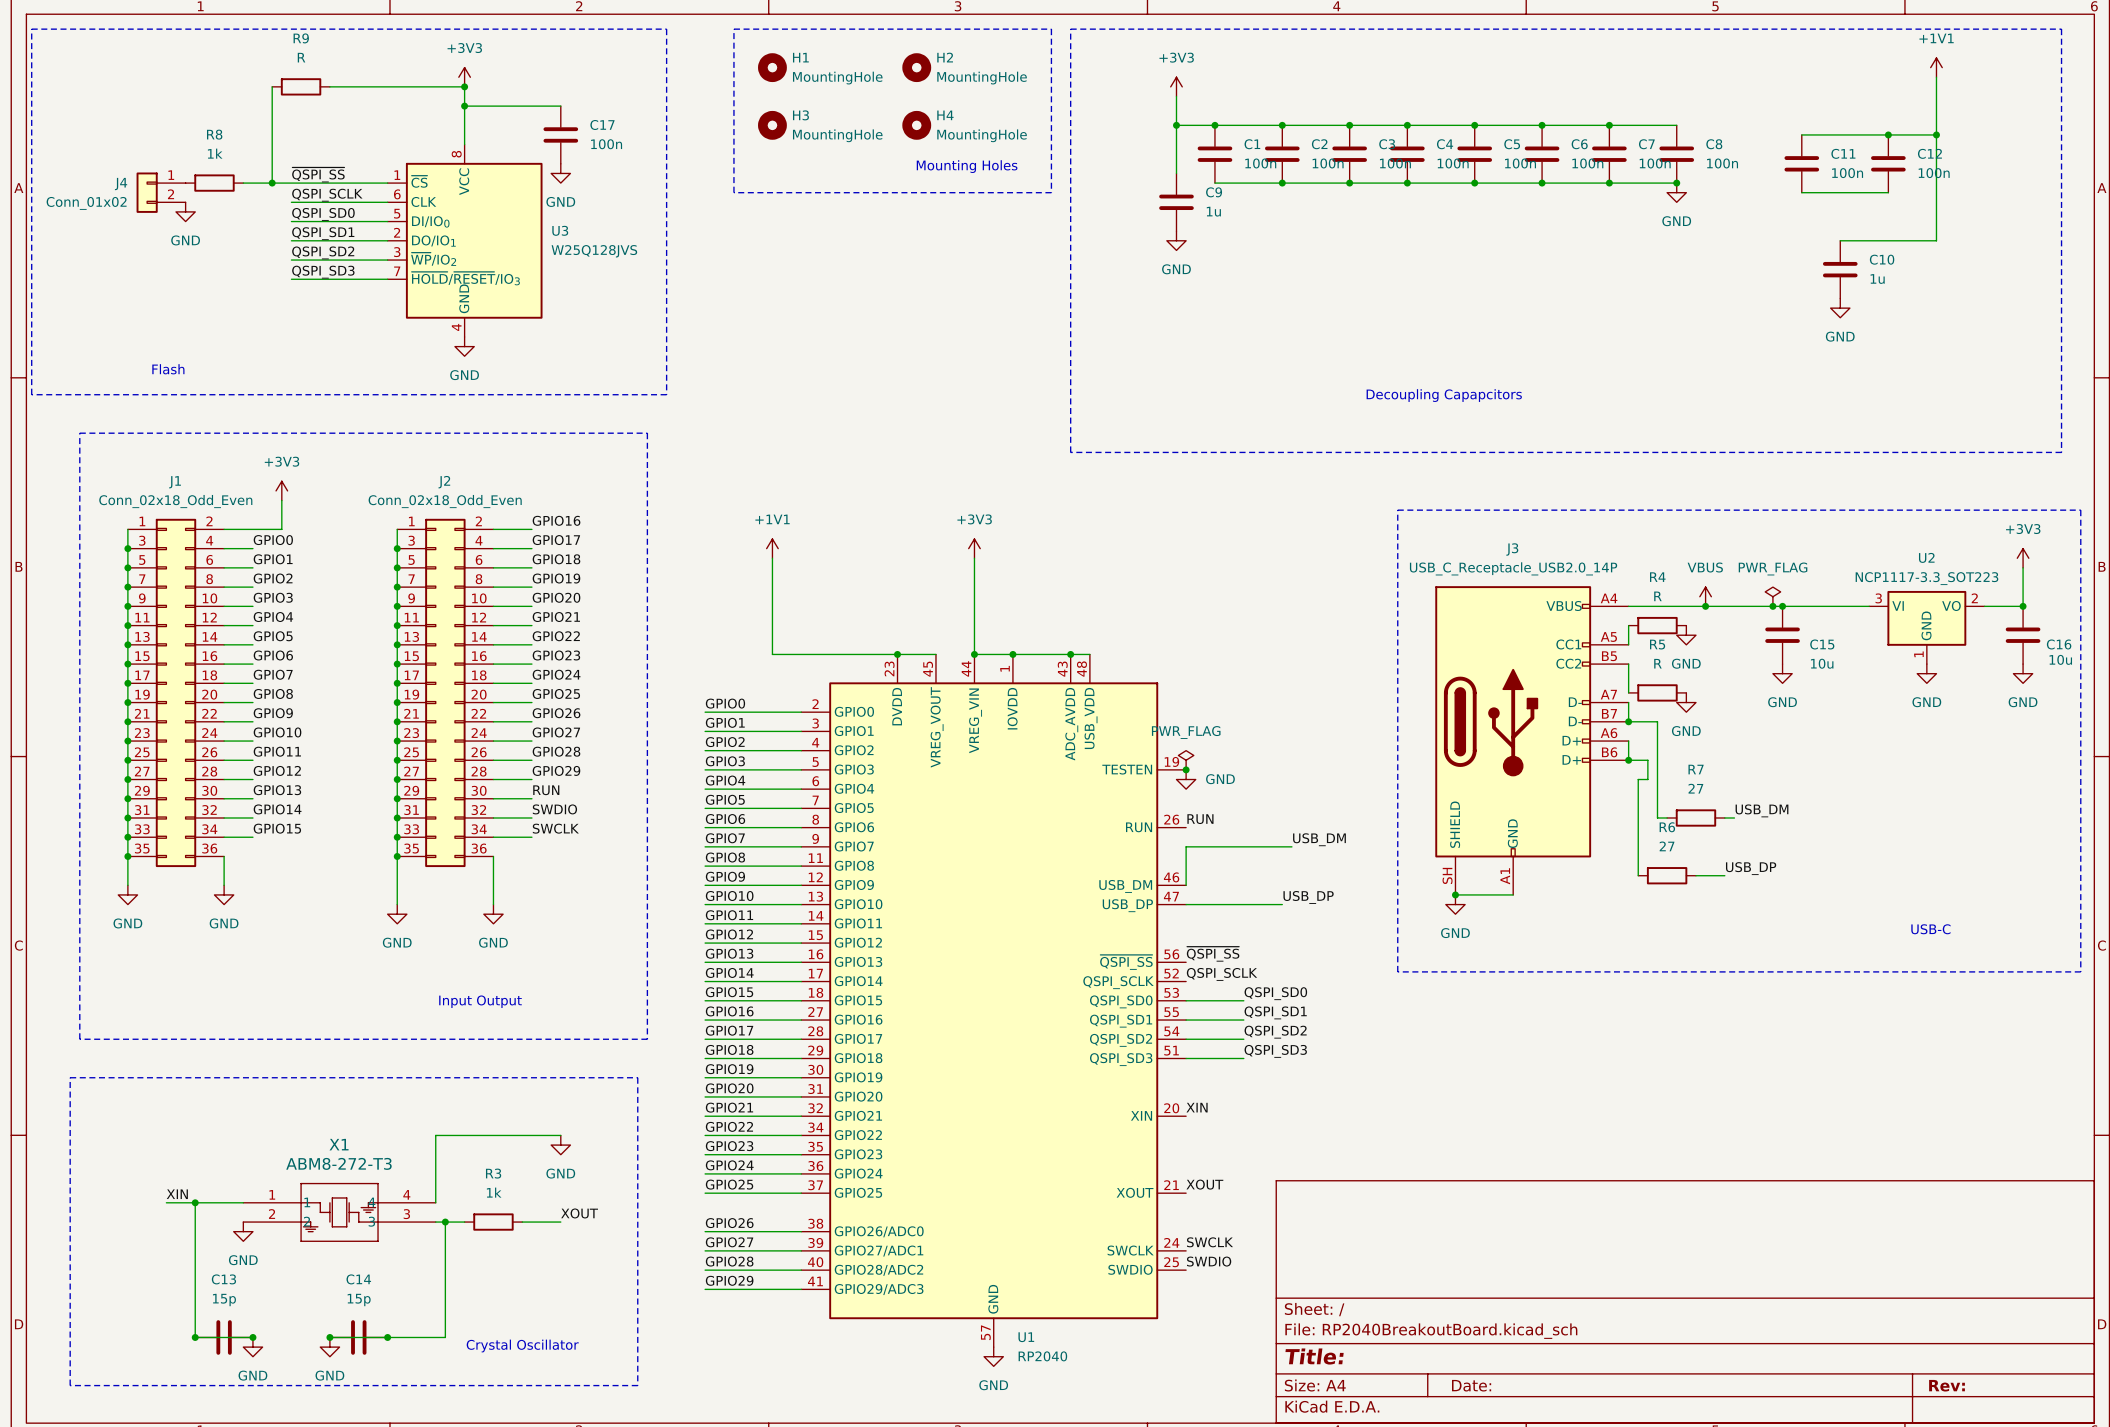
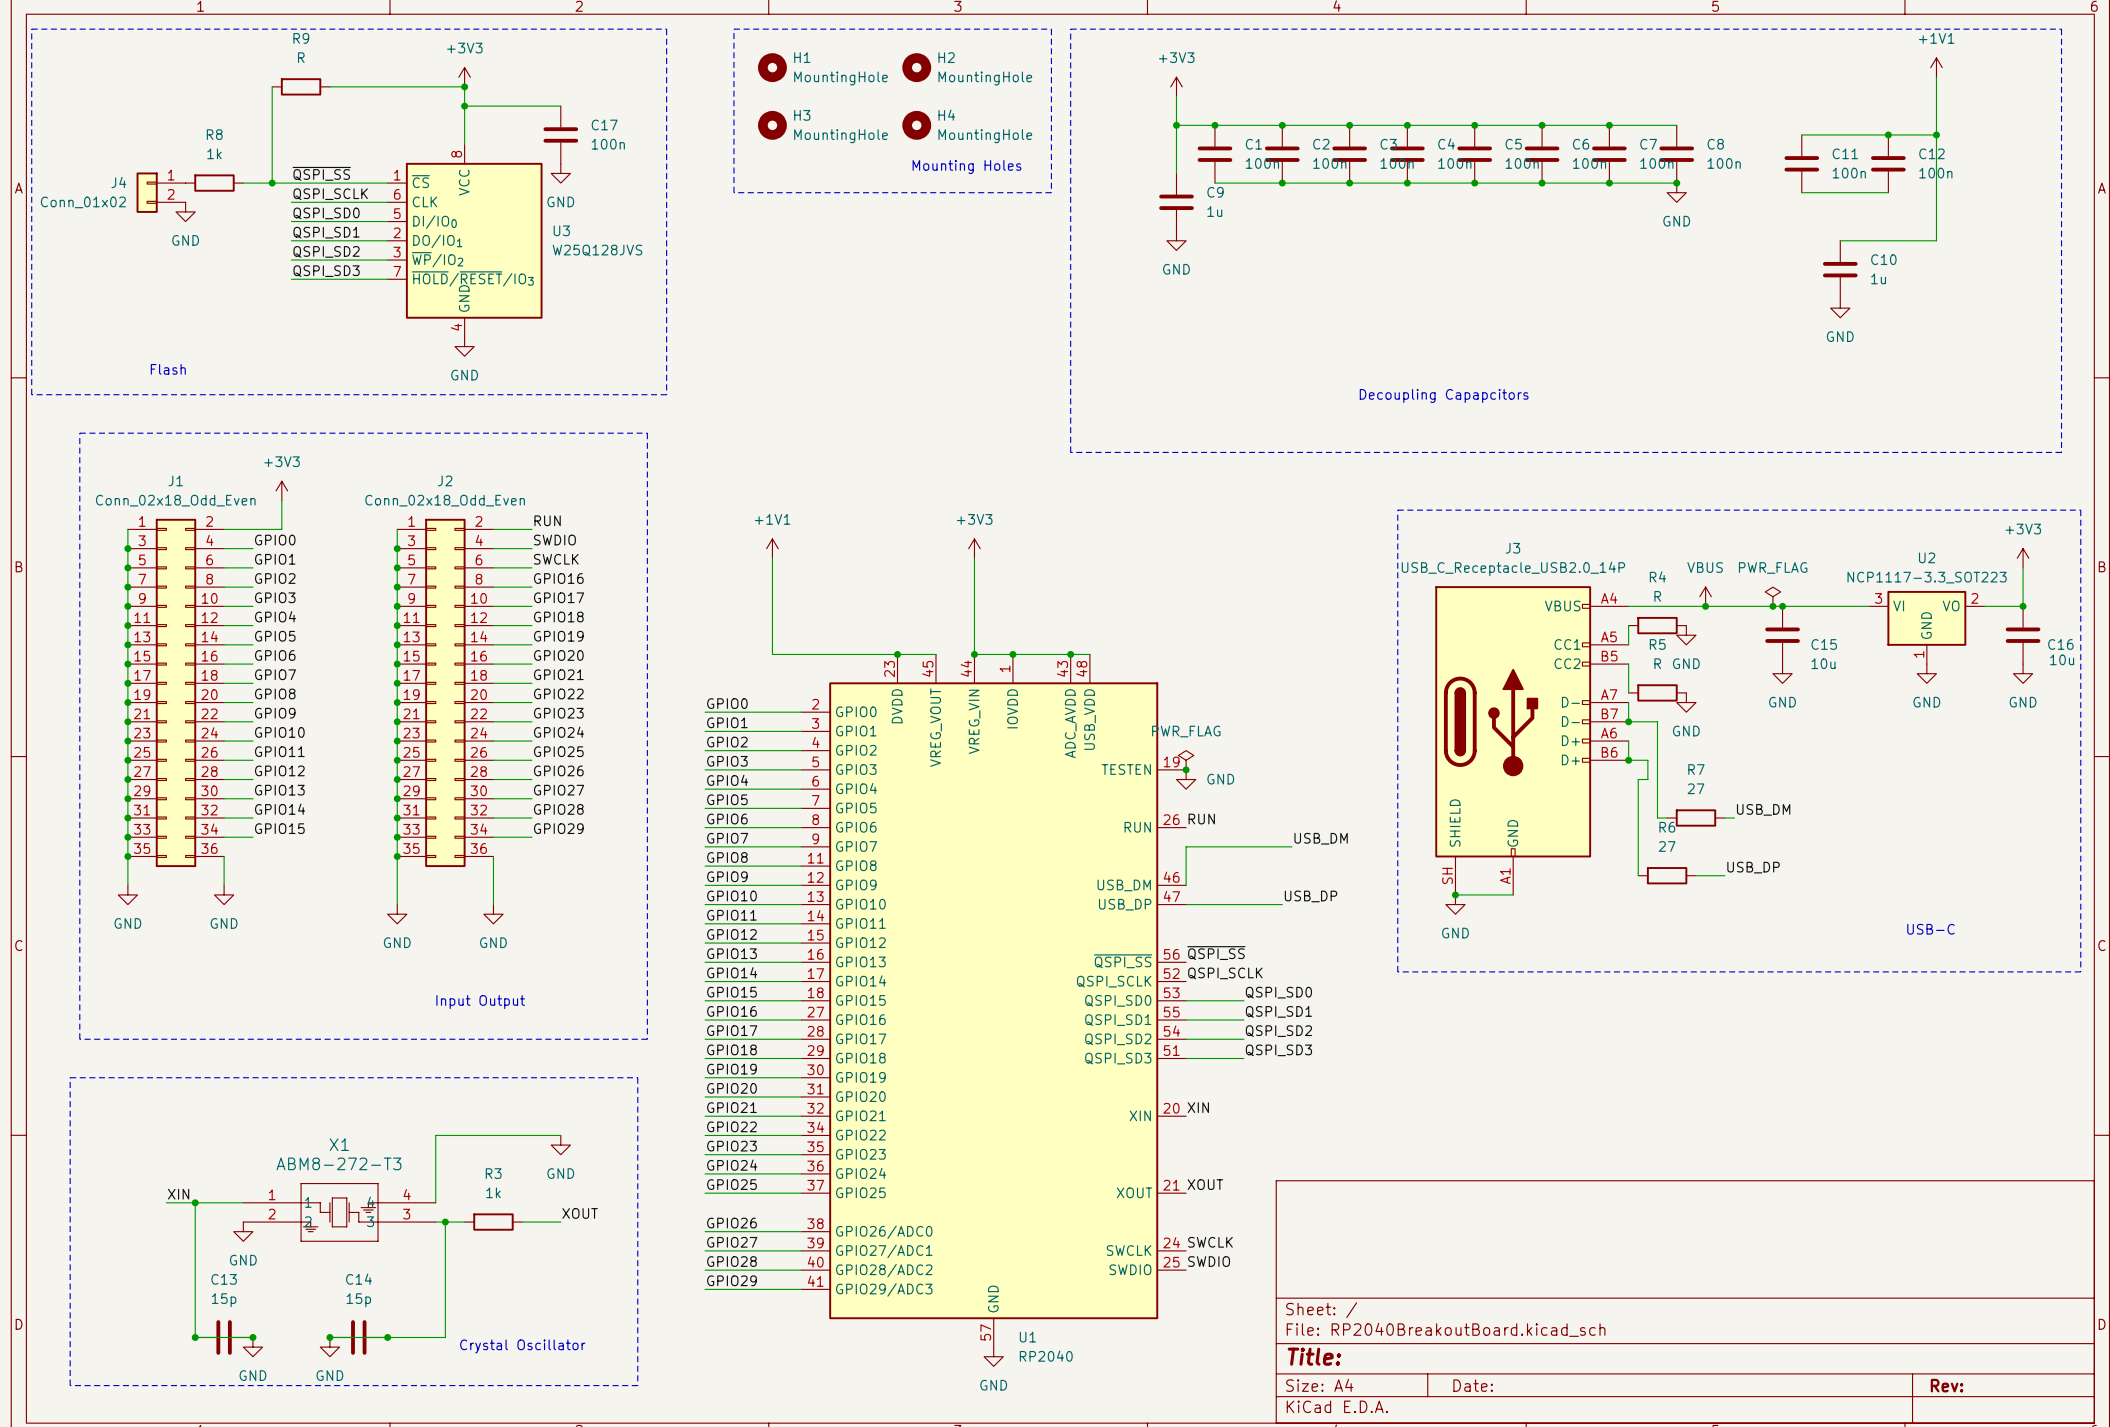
label: GPIO16 (556, 520) -> RUN (547, 520)
label: GPIO17 (556, 540) -> SWDIO (554, 540)
label: GPIO18 (556, 559) -> SWCLK (556, 559)
label: GPIO19 (556, 578) -> GPIO16 (558, 578)
label: GPIO20 (556, 597) -> GPIO17 (559, 597)
label: GPIO21 (556, 617) -> GPIO18 (558, 617)
label: GPIO22 (556, 636) -> GPIO19 (558, 636)
label: GPIO23 (556, 655) -> GPIO20 (558, 655)
label: GPIO24 (556, 674) -> GPIO21 (558, 674)
label: GPIO25 (556, 693) -> GPIO22 (558, 693)
label: GPIO26 (556, 713) -> GPIO23 (558, 713)
label: GPIO27 (556, 732) -> GPIO24 (559, 732)
label: GPIO28 (556, 751) -> GPIO25 (558, 751)
label: GPIO29 (556, 770) -> GPIO26 (558, 770)
label: RUN (546, 790) -> GPIO27 (559, 790)
label: SWDIO (554, 809) -> GPIO28 (558, 809)
label: SWCLK (555, 828) -> GPIO29 (558, 828)

